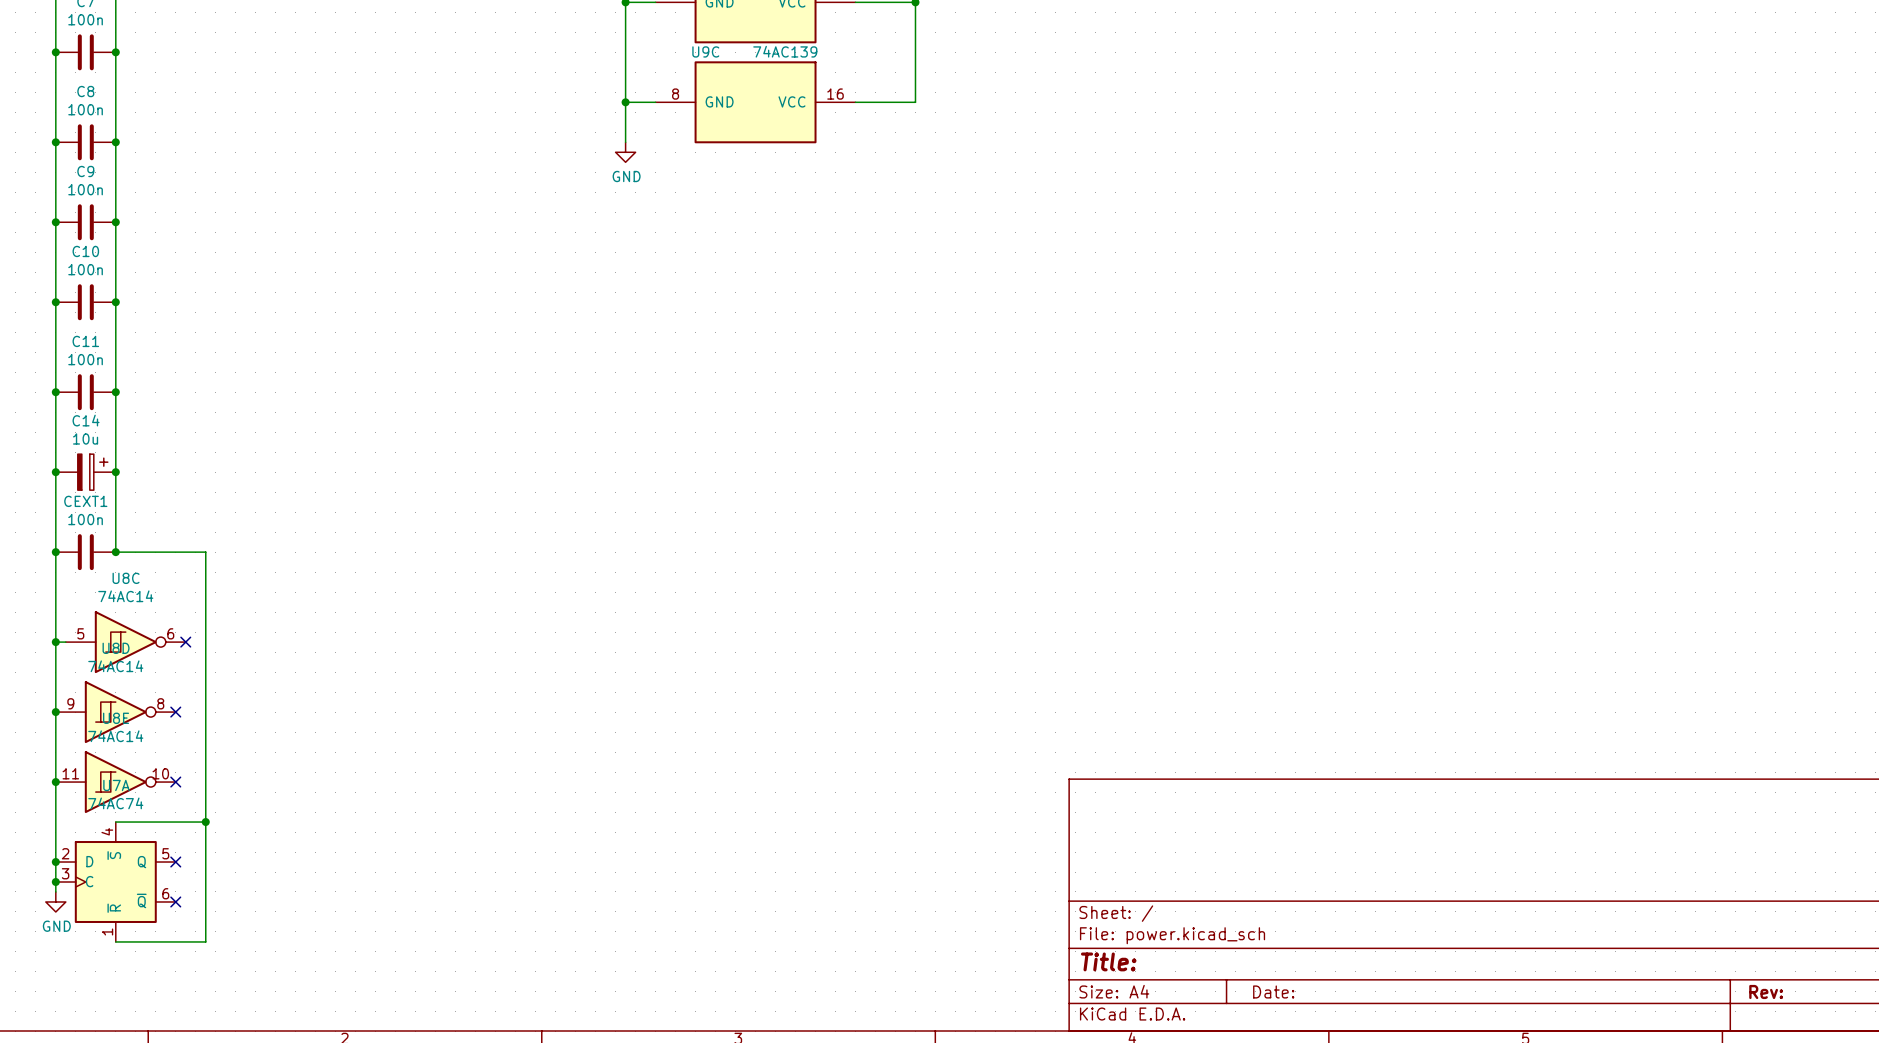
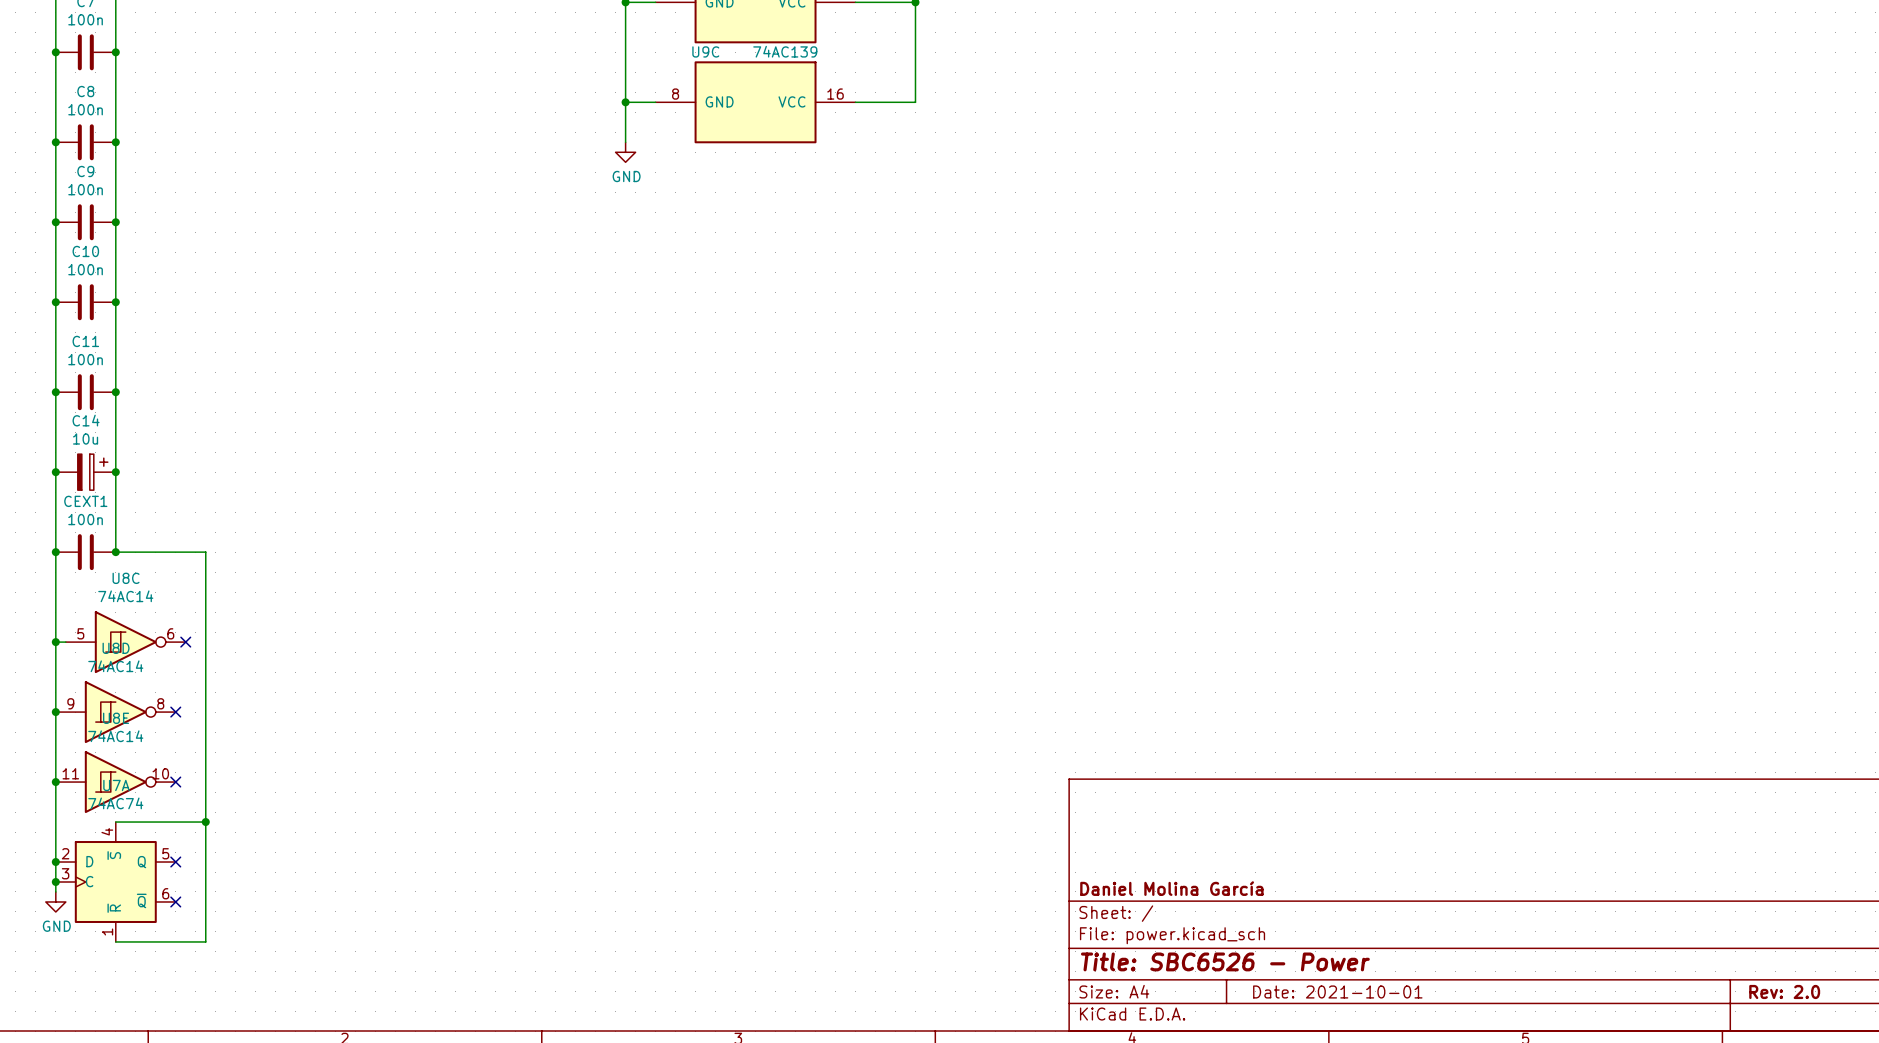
title block: none -> Daniel Molina García (1171, 888)
title block: Title: (1108, 961) -> Title: SBC6526 - Power (1225, 961)
title block: Date: (1273, 991) -> Date: 2021-10-01 (1337, 991)
title block: Rev: (1766, 991) -> Rev: 2.0 (1784, 991)

